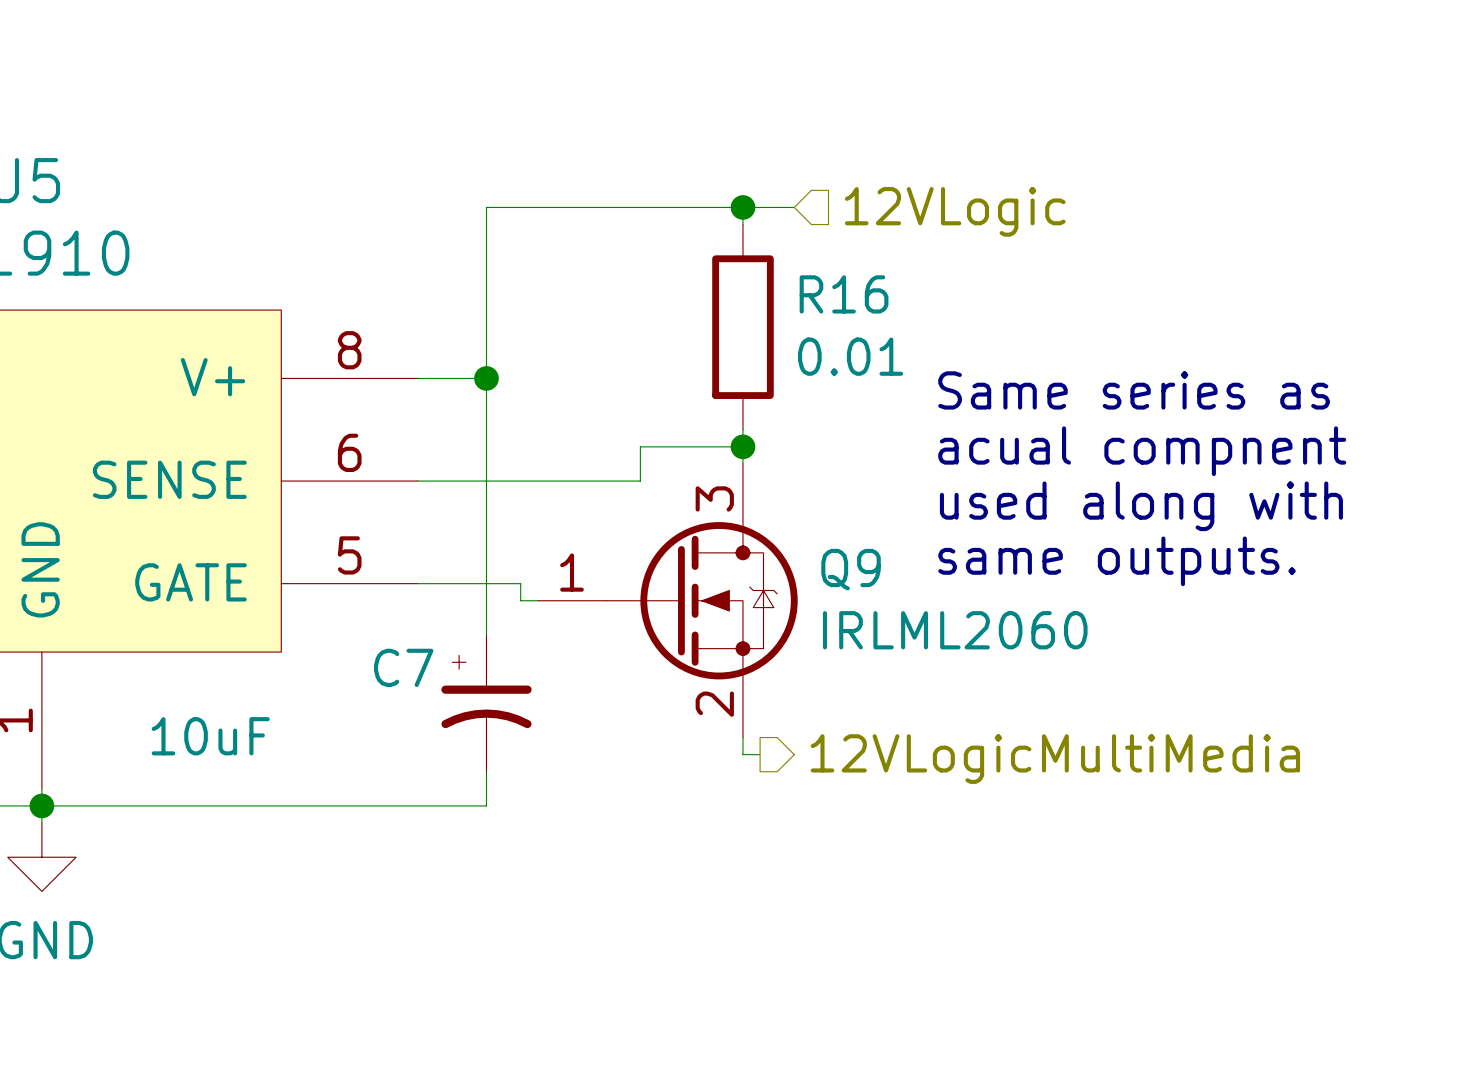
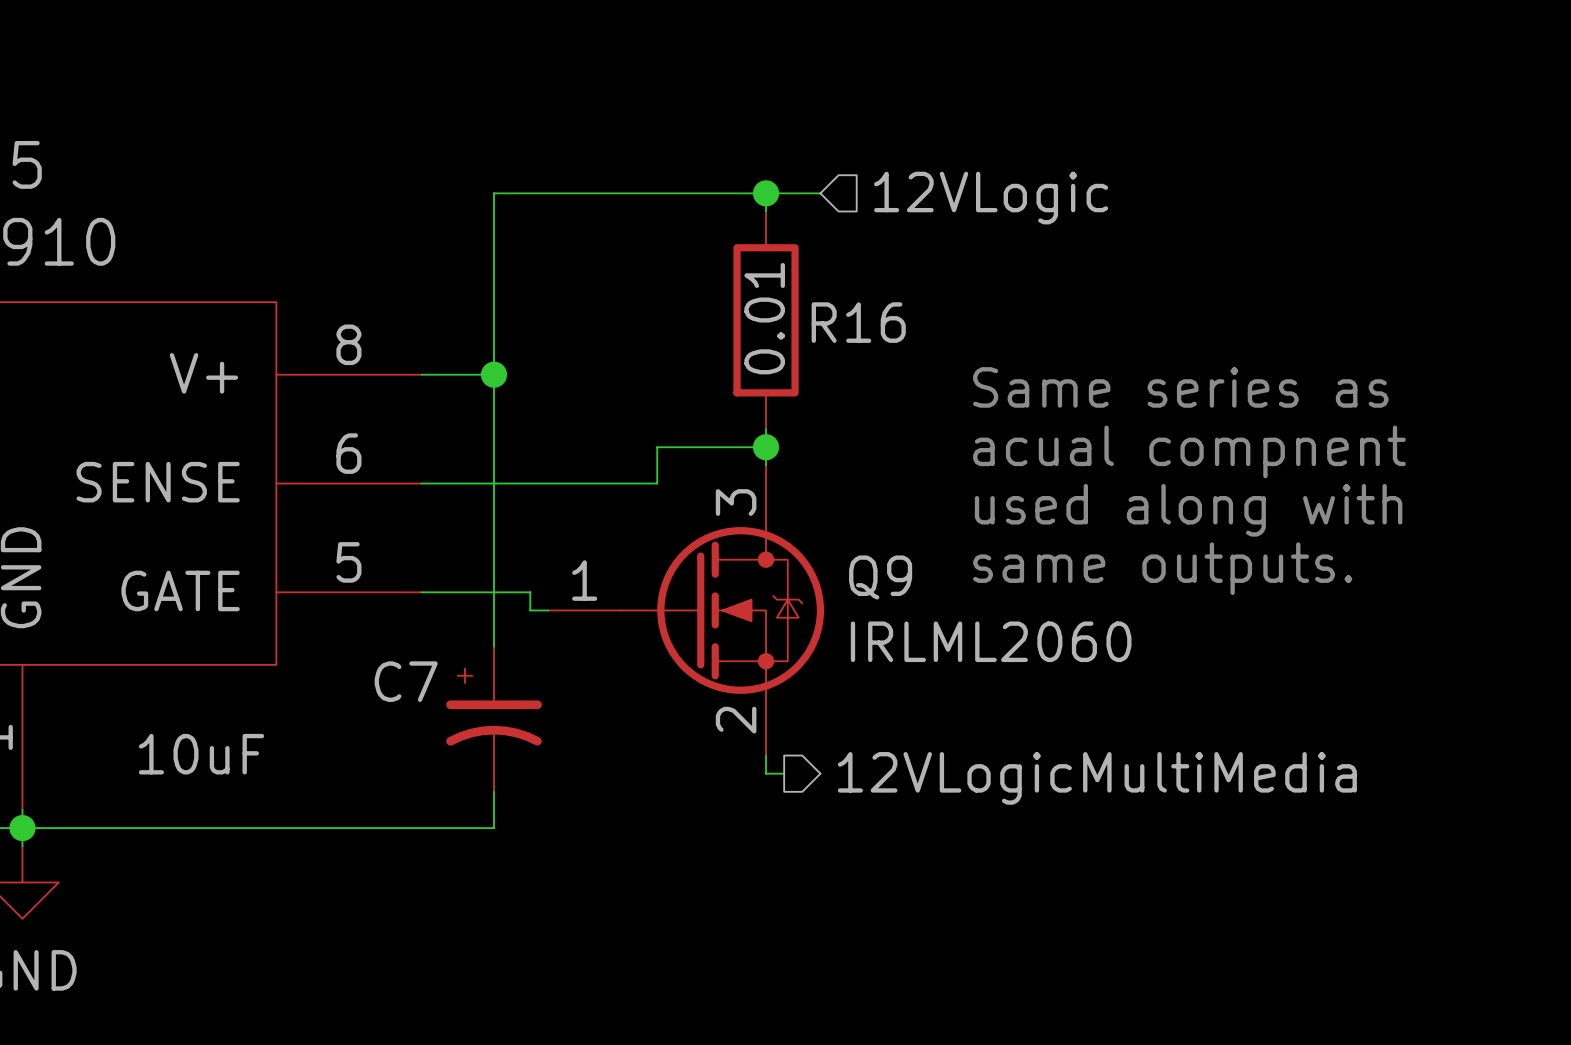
R16 name position: R16 (844, 294) -> R16 (858, 322)
R16 value rotation: 0° (850, 356) -> 90° counterclockwise (764, 318)

